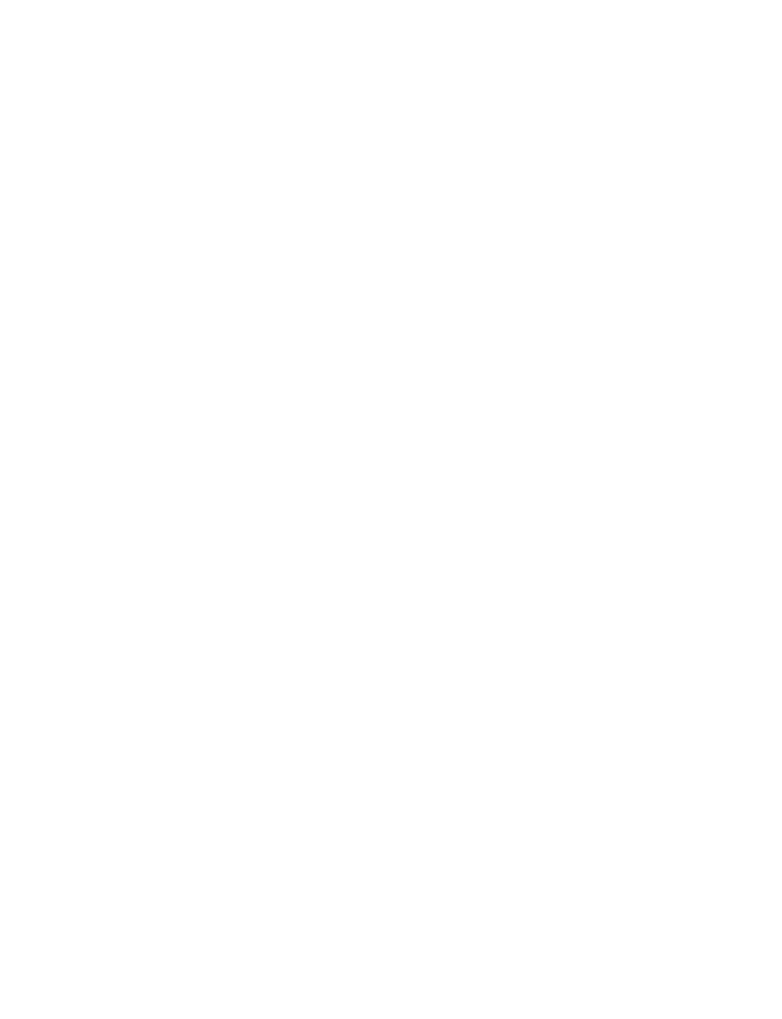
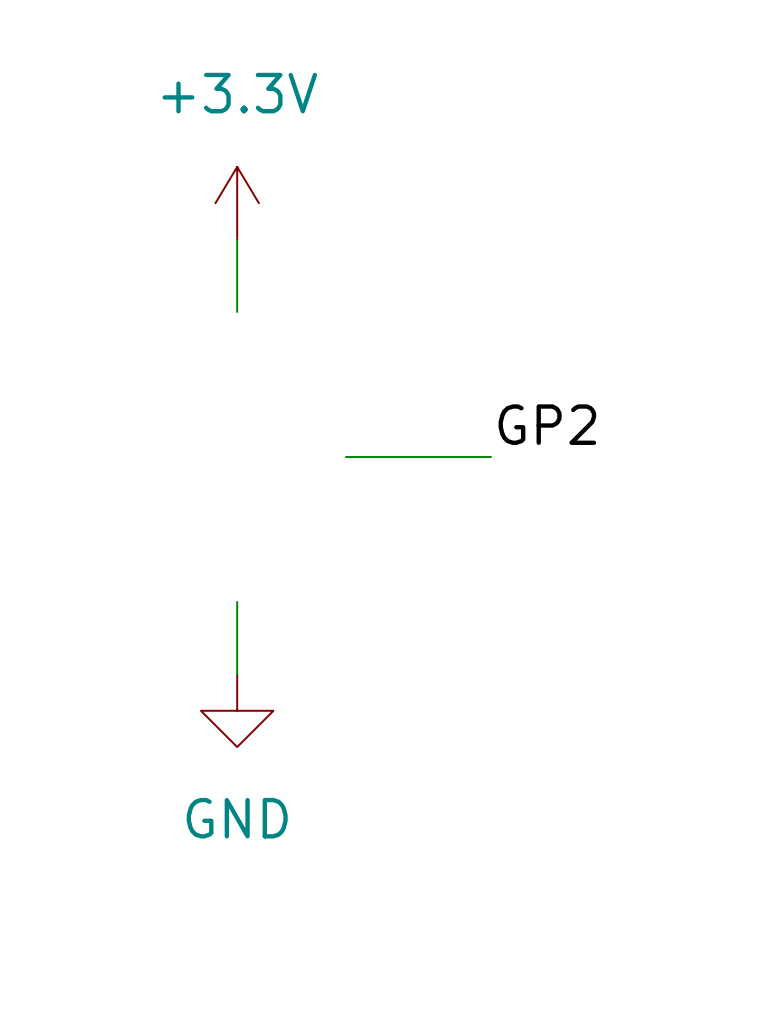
power symbol: none -> +3.3V (237, 203)
wire: none -> (237, 239) (237, 311)
label: none -> GP2 (547, 424)
wire: none -> (345, 457) (490, 457)
wire: none -> (237, 602) (237, 674)
power symbol: none -> GND (237, 710)

